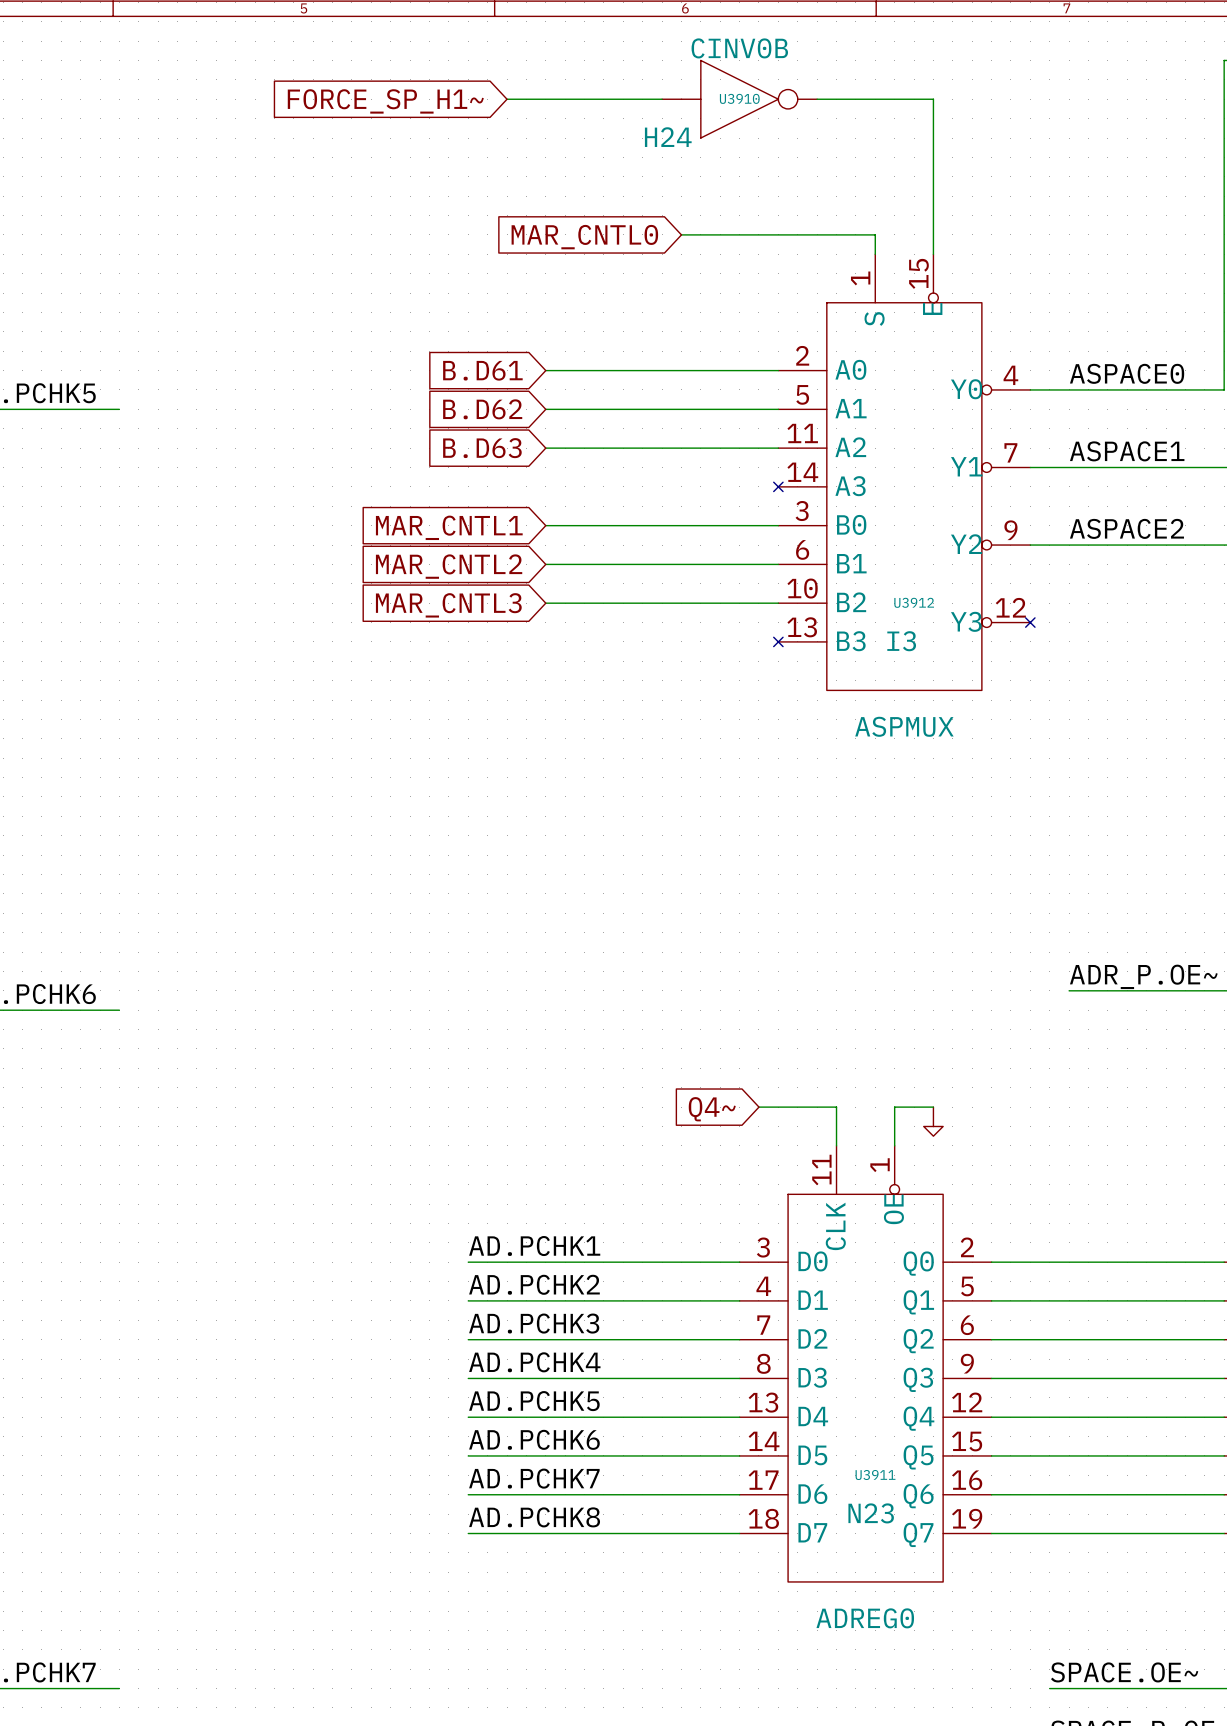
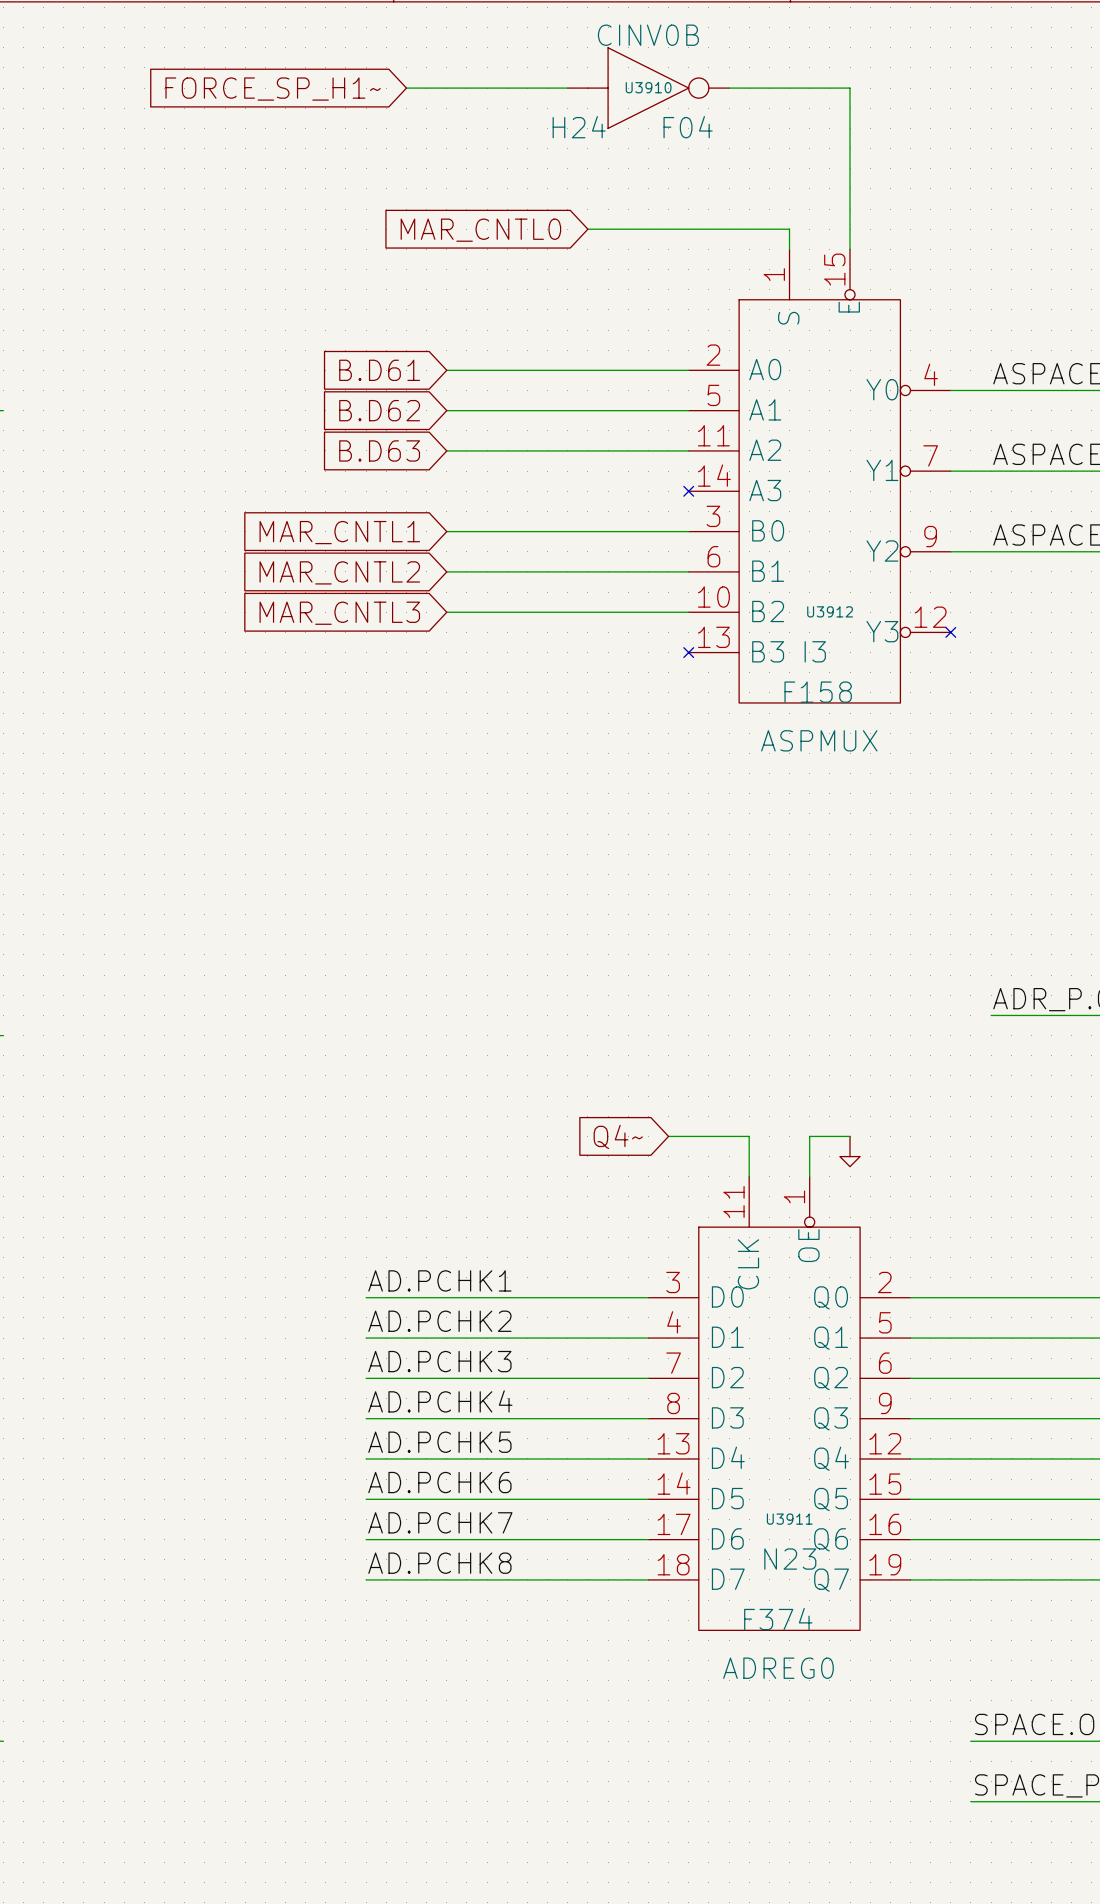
U3910 value: none -> F04 (688, 127)
U3912 value: none -> F158 (818, 692)
U3911 value: none -> F374 (778, 1619)

